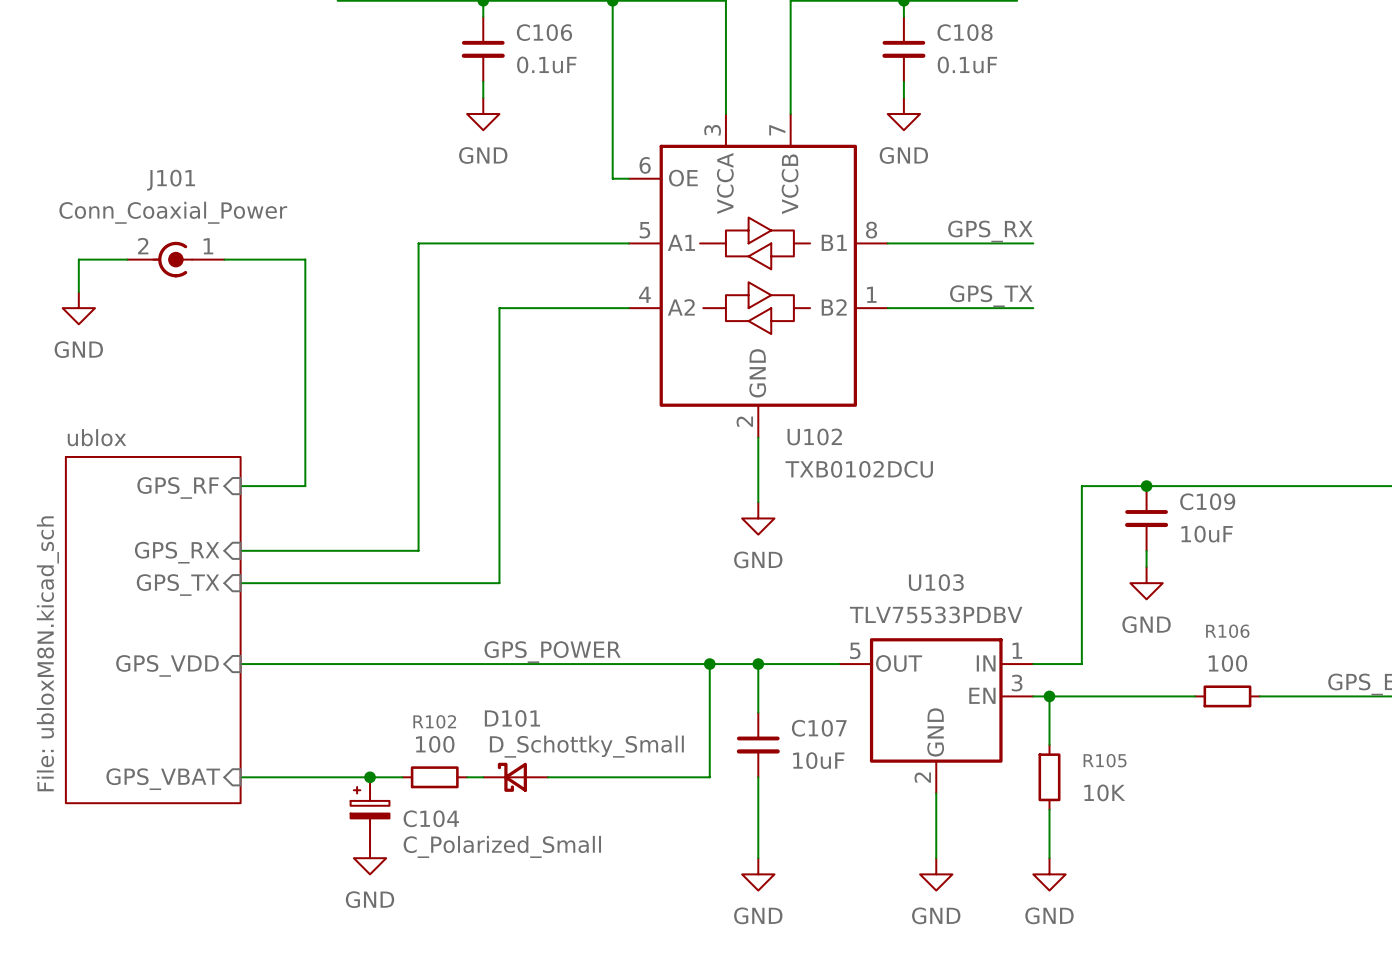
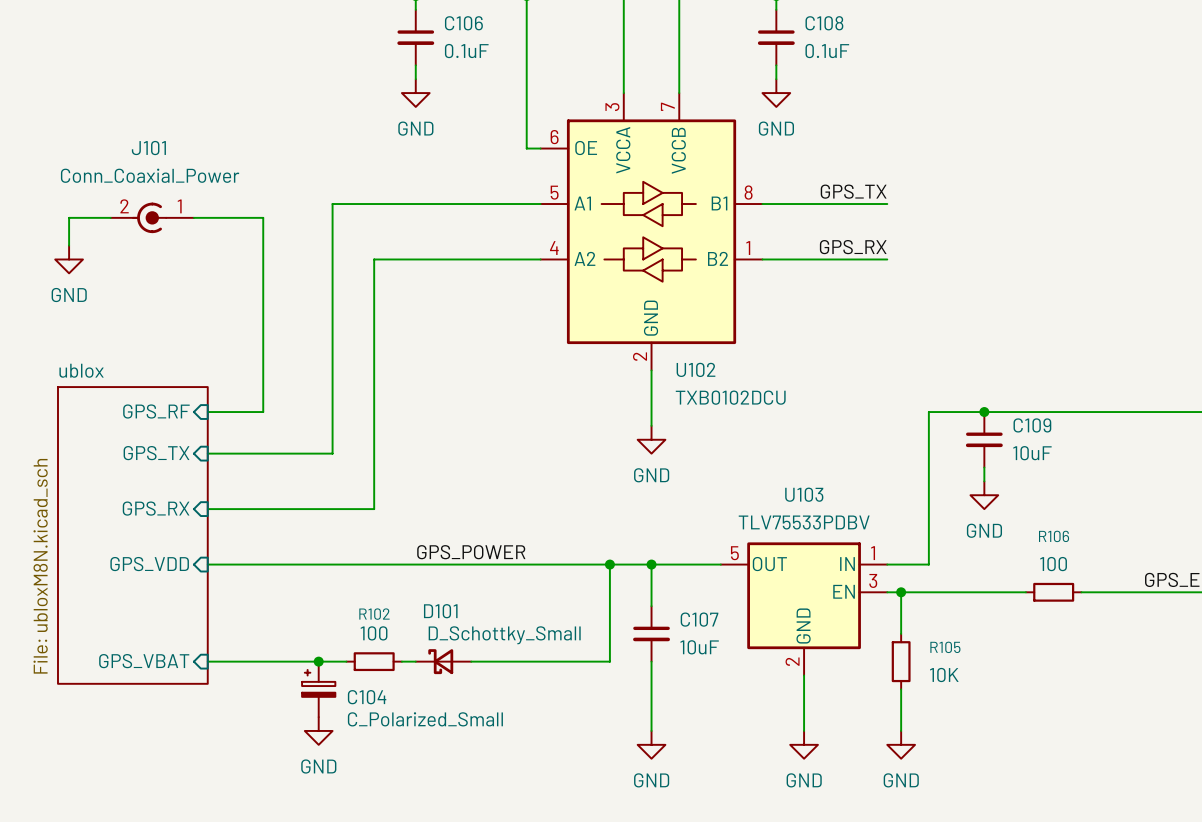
label: GPS_RX (990, 231) -> GPS_TX (853, 191)
wire: (418, 243) (418, 550) (240, 550) -> (360, 204) (332, 204) (332, 453) (207, 453)
label: GPS_TX (991, 296) -> GPS_RX (853, 247)
wire: (499, 308) (499, 583) (240, 583) -> (429, 259) (374, 259) (374, 509) (207, 509)
sheet pin position: GPS_RX (177, 552) -> GPS_RX (156, 508)
sheet pin position: GPS_TX (178, 585) -> GPS_TX (156, 453)

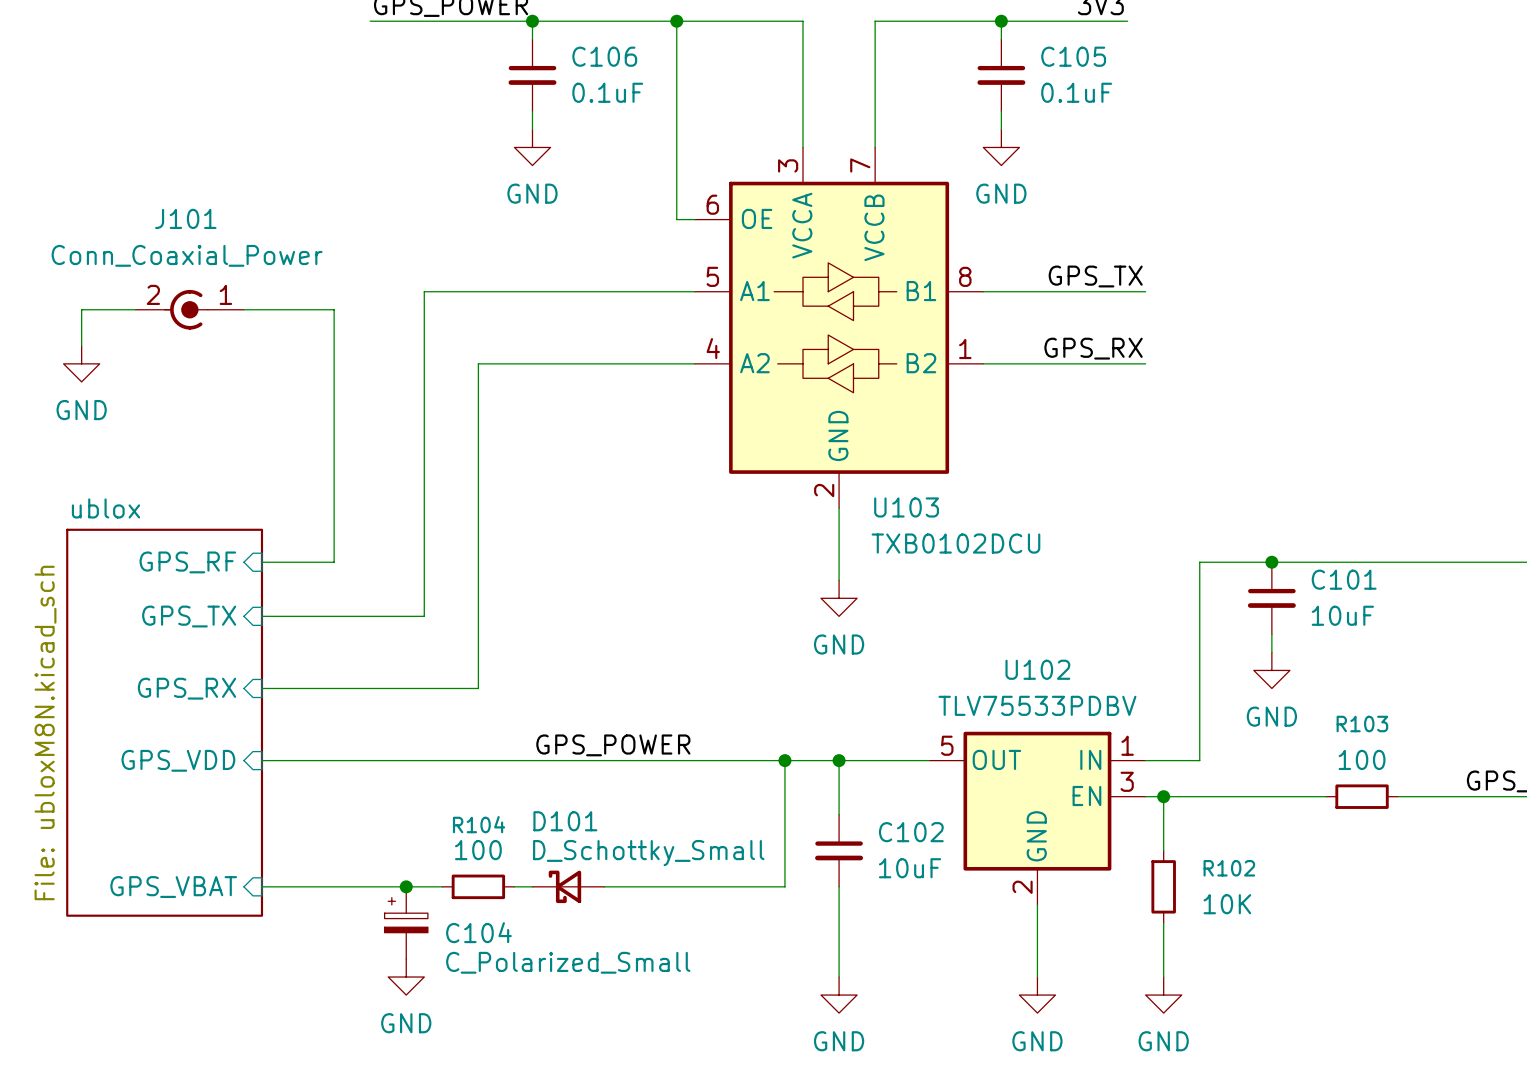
C108 name: C108 (824, 23) -> C105 (1073, 56)
U102 name: U102 (696, 369) -> U103 (906, 507)
C109 name: C109 (1032, 425) -> C101 (1344, 579)
U103 name: U103 (804, 494) -> U102 (1037, 669)
R106 name: R106 (1054, 536) -> R103 (1362, 724)
R102 name: R102 (374, 614) -> R104 (479, 824)
C107 name: C107 (699, 619) -> C102 (911, 832)
R105 name: R105 (945, 647) -> R102 (1229, 868)

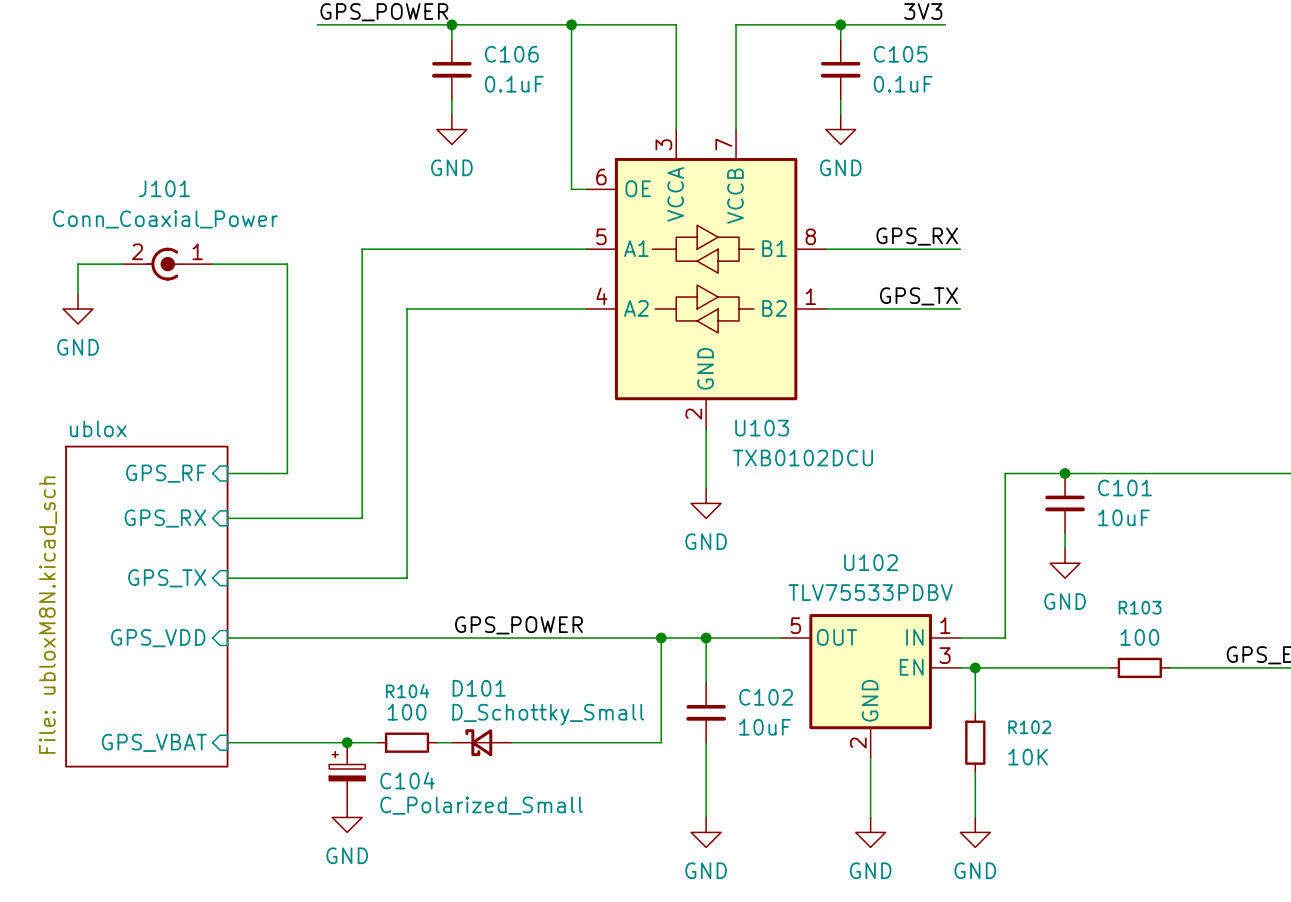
label: GPS_TX (1095, 276) -> GPS_RX (917, 236)
label: GPS_RX (1093, 348) -> GPS_TX (918, 296)
sheet pin: GPS_TX (189, 616) -> GPS_RX (165, 518)
sheet pin: GPS_RX (186, 688) -> GPS_TX (167, 578)

